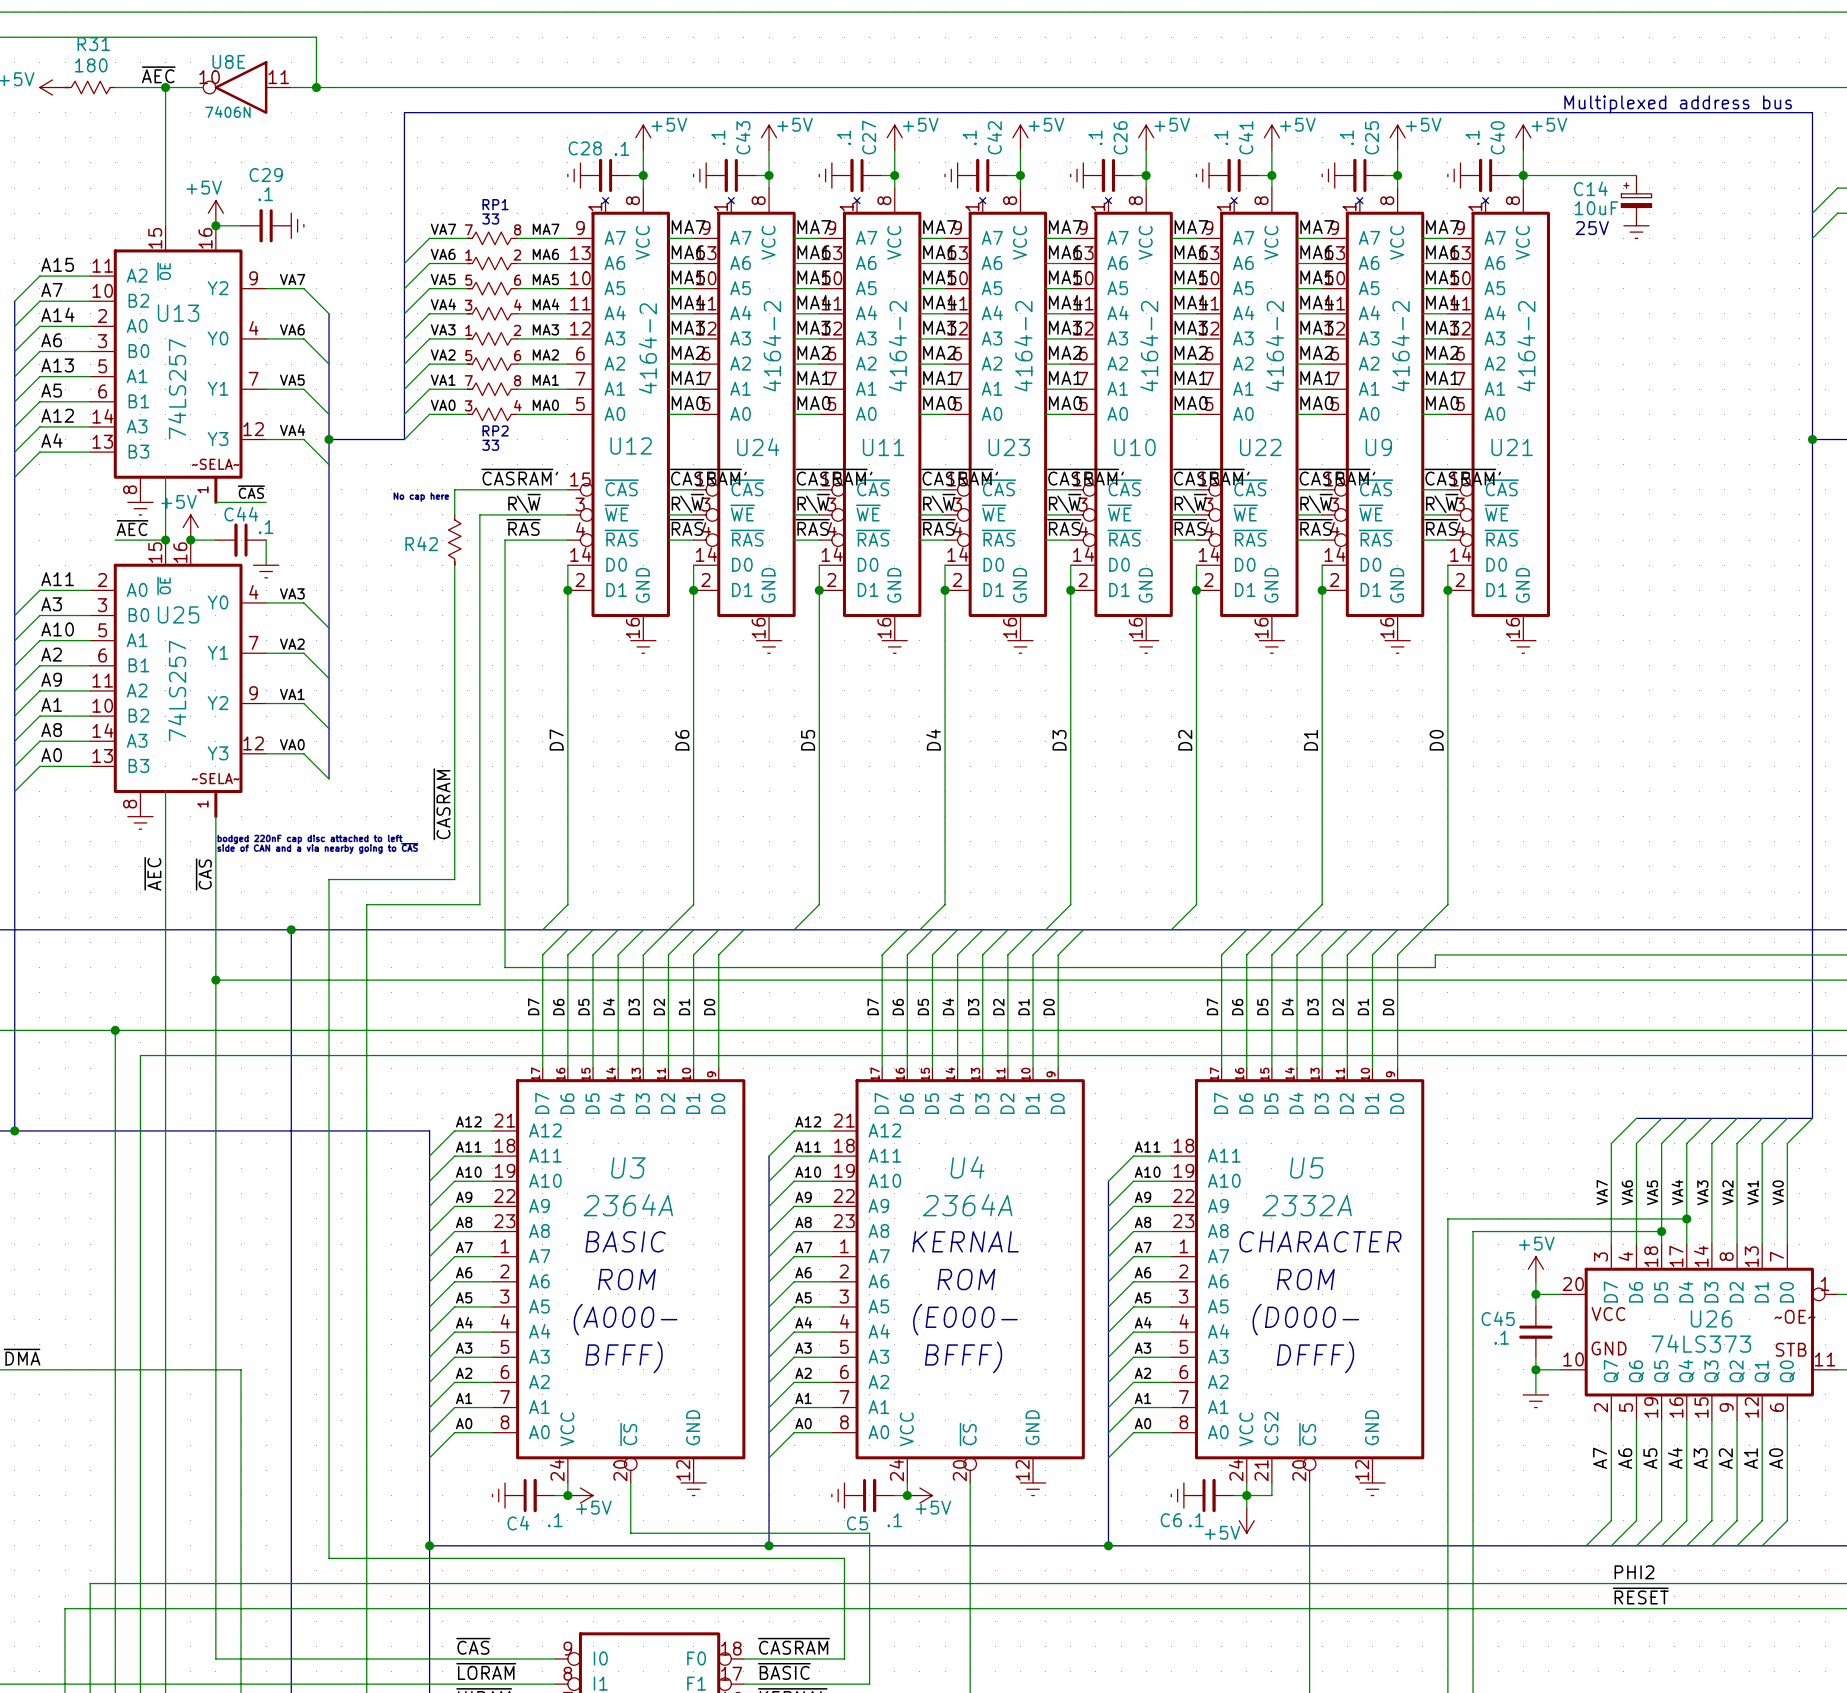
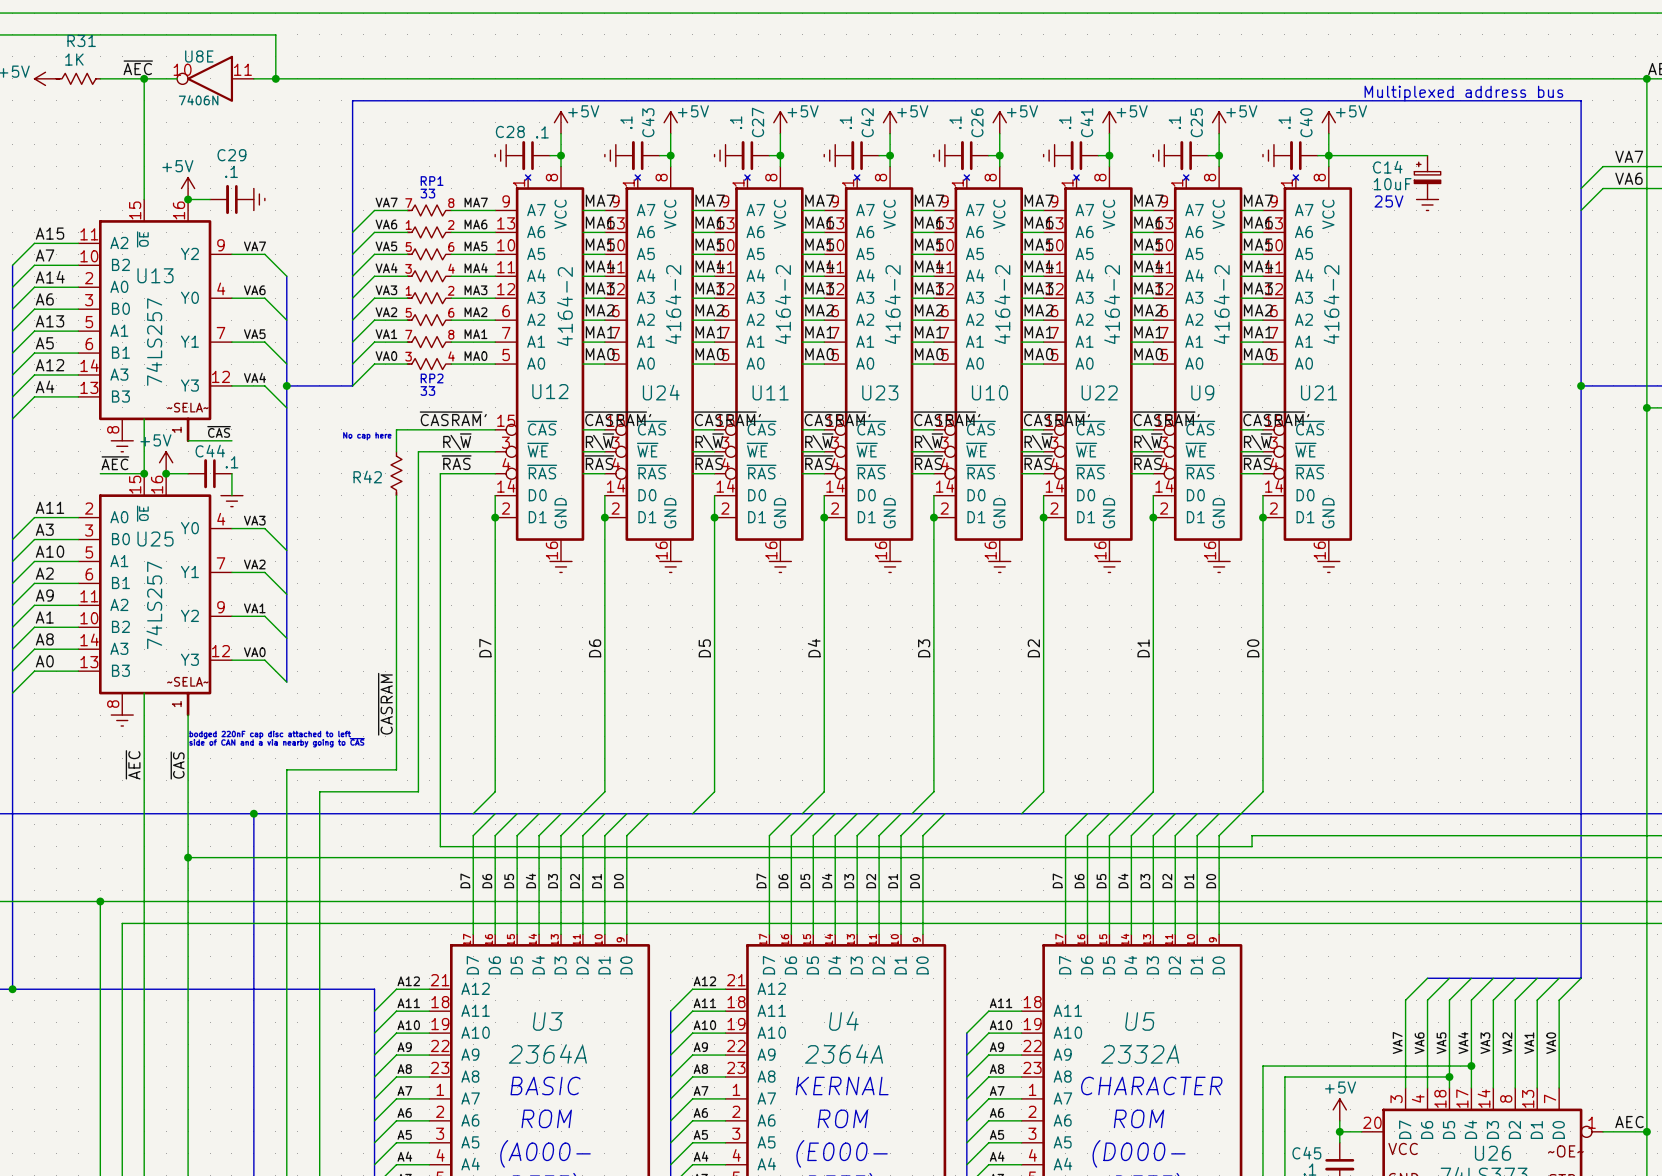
R31 value: 180 (91, 65) -> 1K (74, 59)

